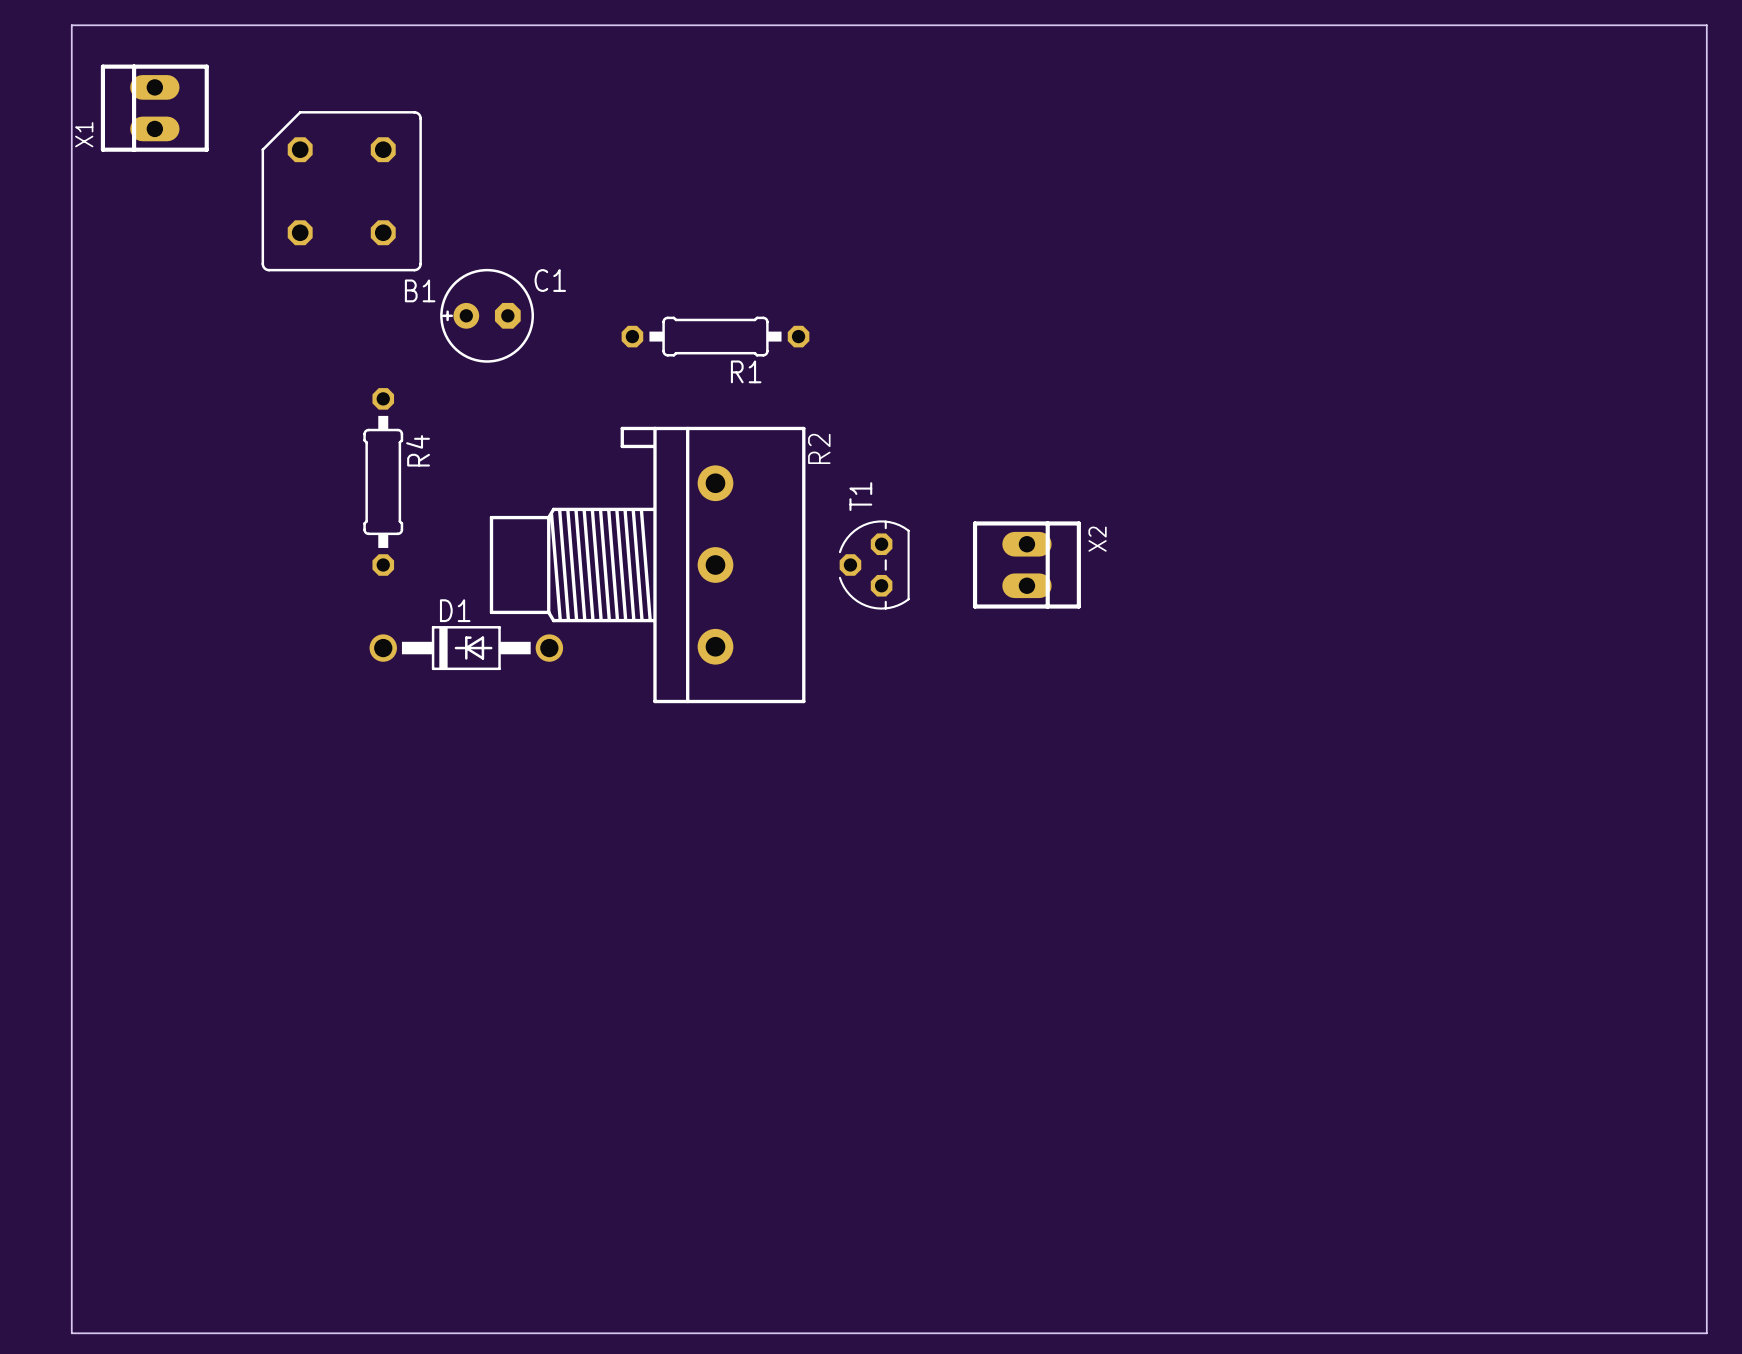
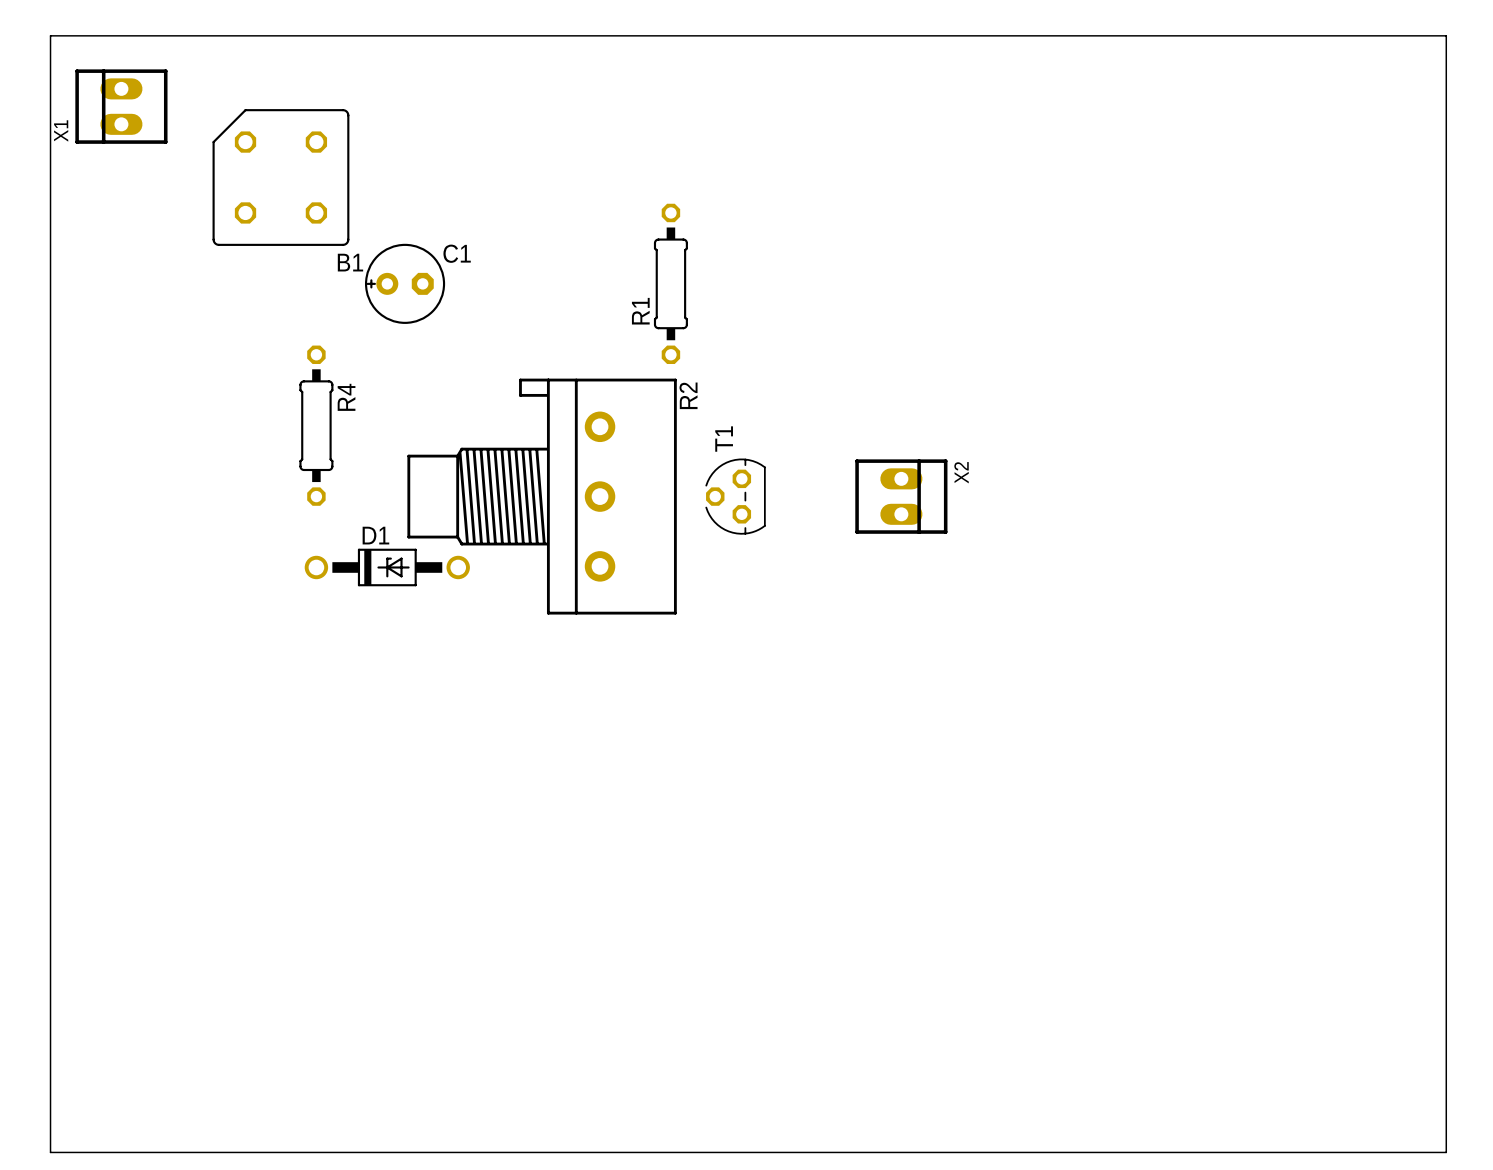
R1 rotation: 0° (715, 336) -> 90° clockwise (670, 283)
X2 position: (1026, 564) -> (901, 496)

